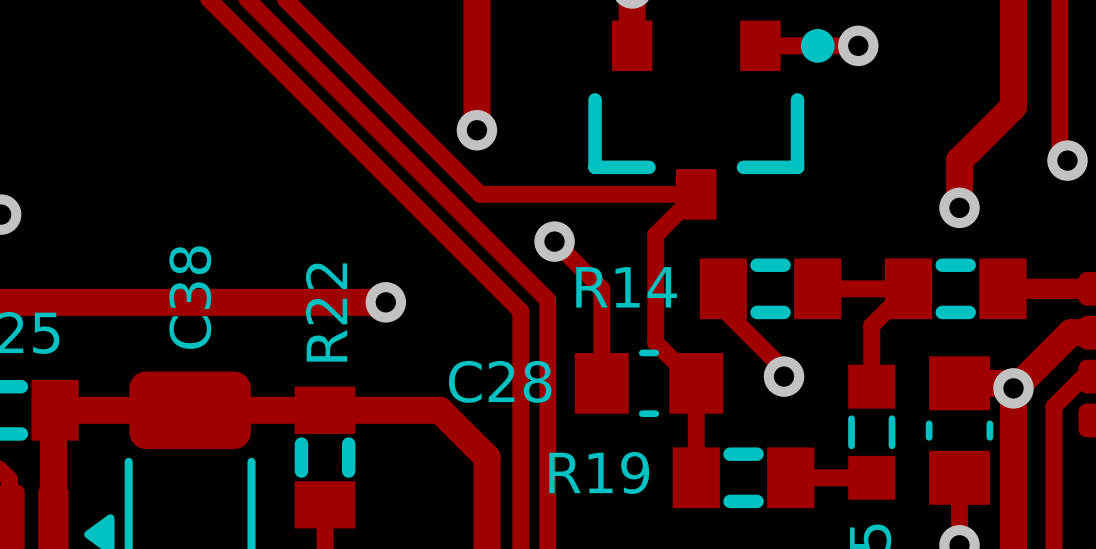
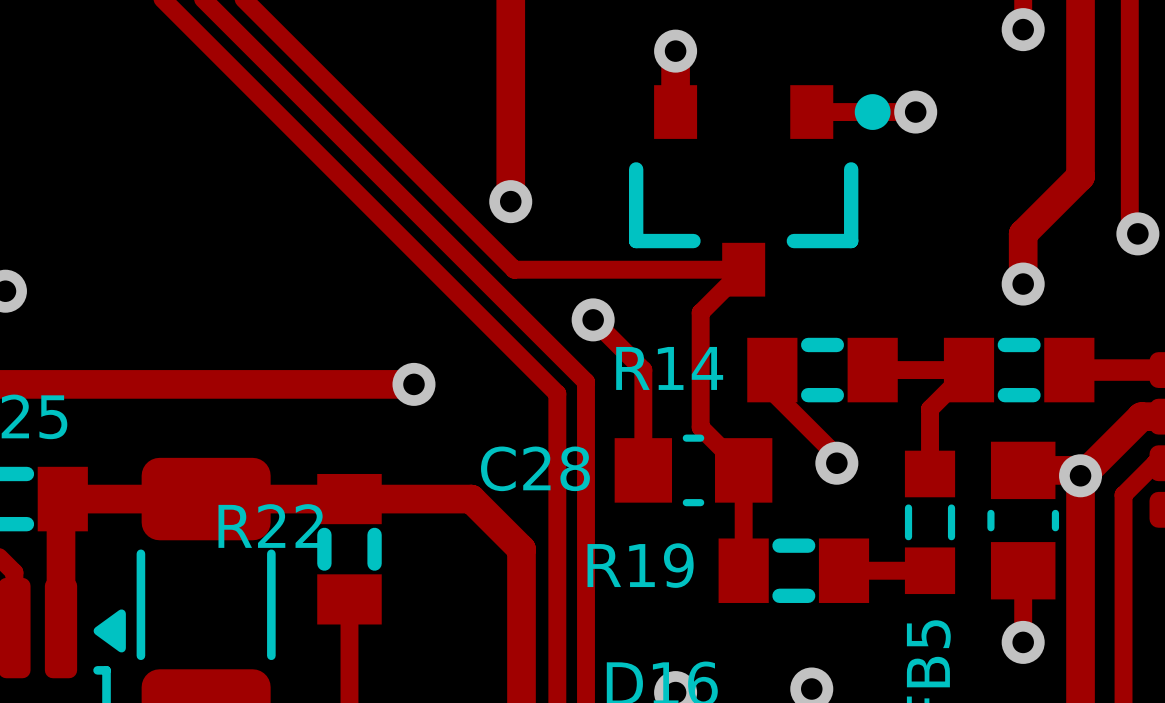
C38 name: C38 (190, 297) -> none
R22 name rotation: 0° (326, 312) -> 90° clockwise (270, 526)
R22 name position: R22 (326, 312) -> R22 (270, 526)

